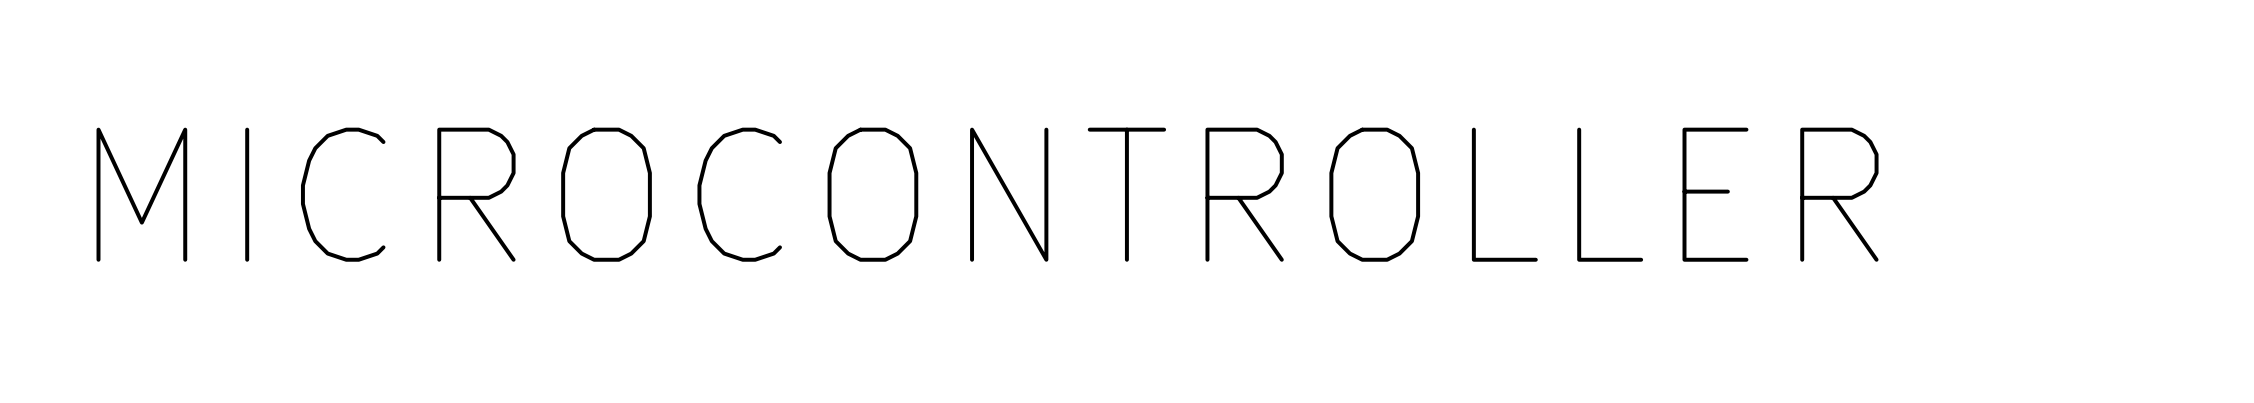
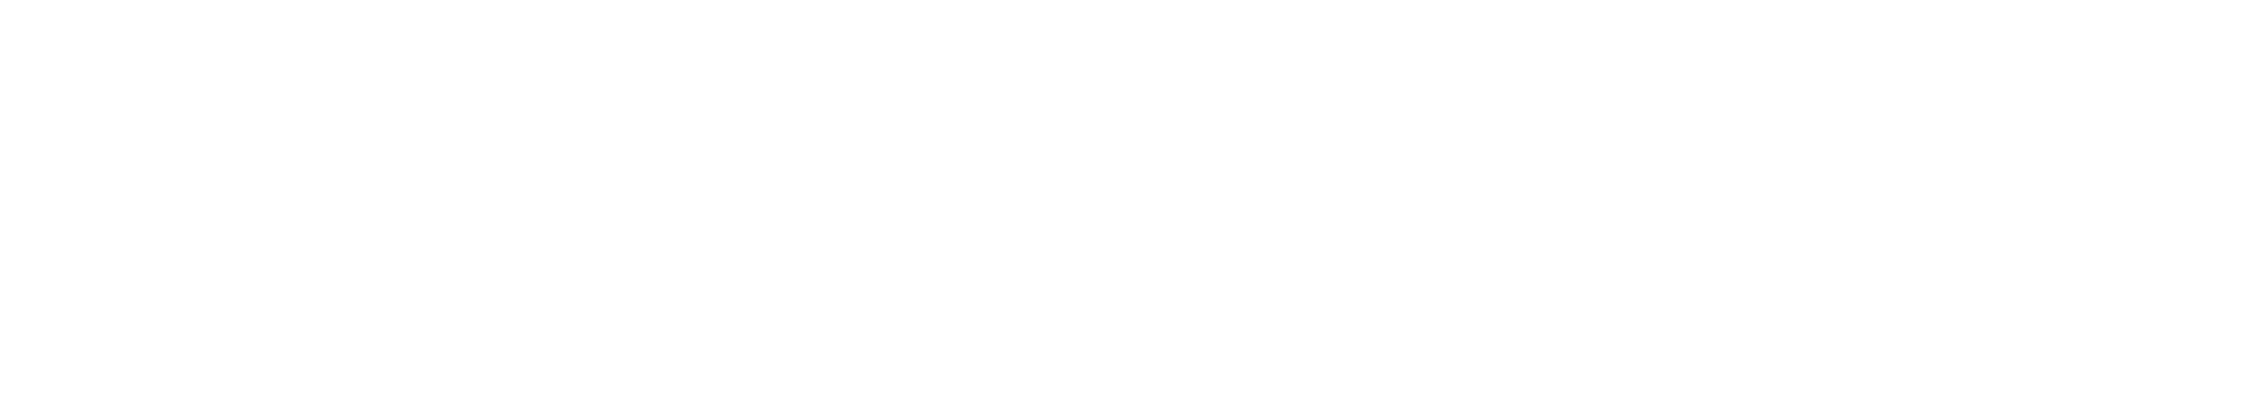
text: MICROCONTROLLER (987, 194) -> none

